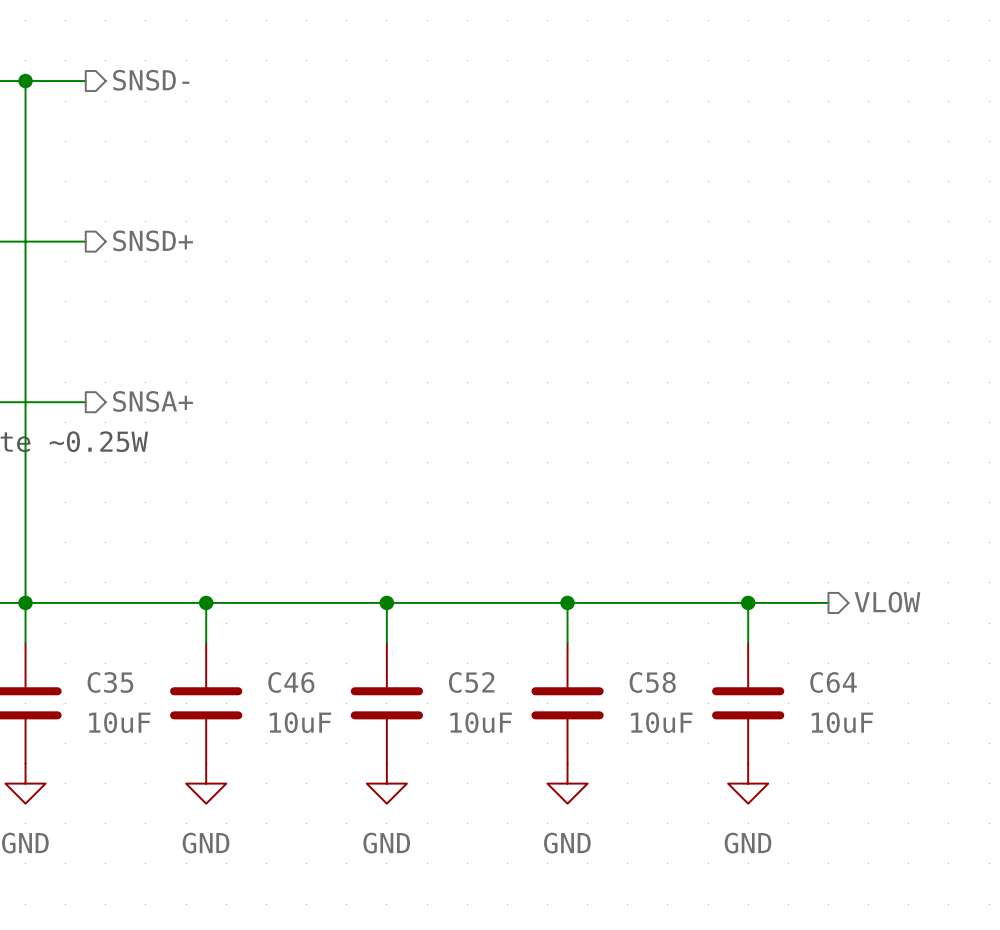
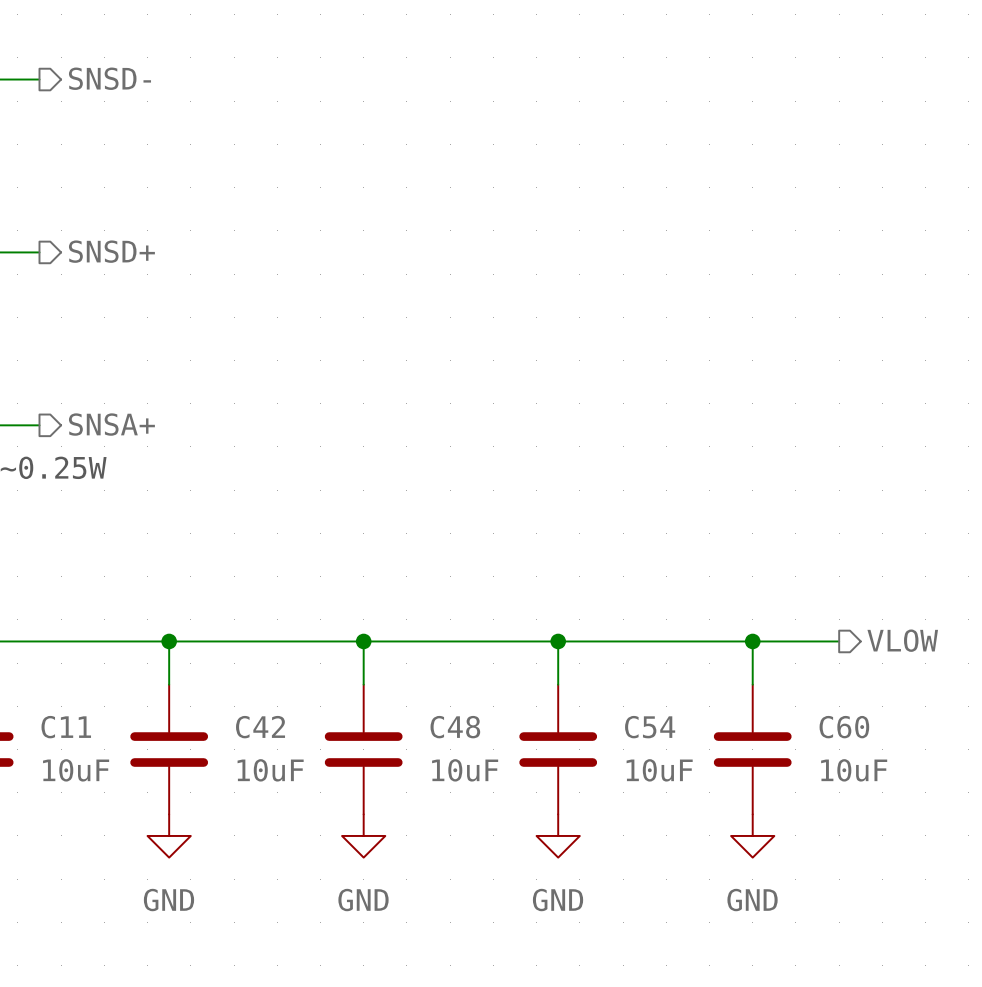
C35 name: C35 (110, 682) -> C11 (66, 727)
C46 name: C46 (291, 682) -> C42 (260, 727)
C52 name: C52 (471, 682) -> C48 (455, 727)
C58 name: C58 (652, 682) -> C54 (650, 727)
C64 name: C64 (833, 682) -> C60 (844, 727)

